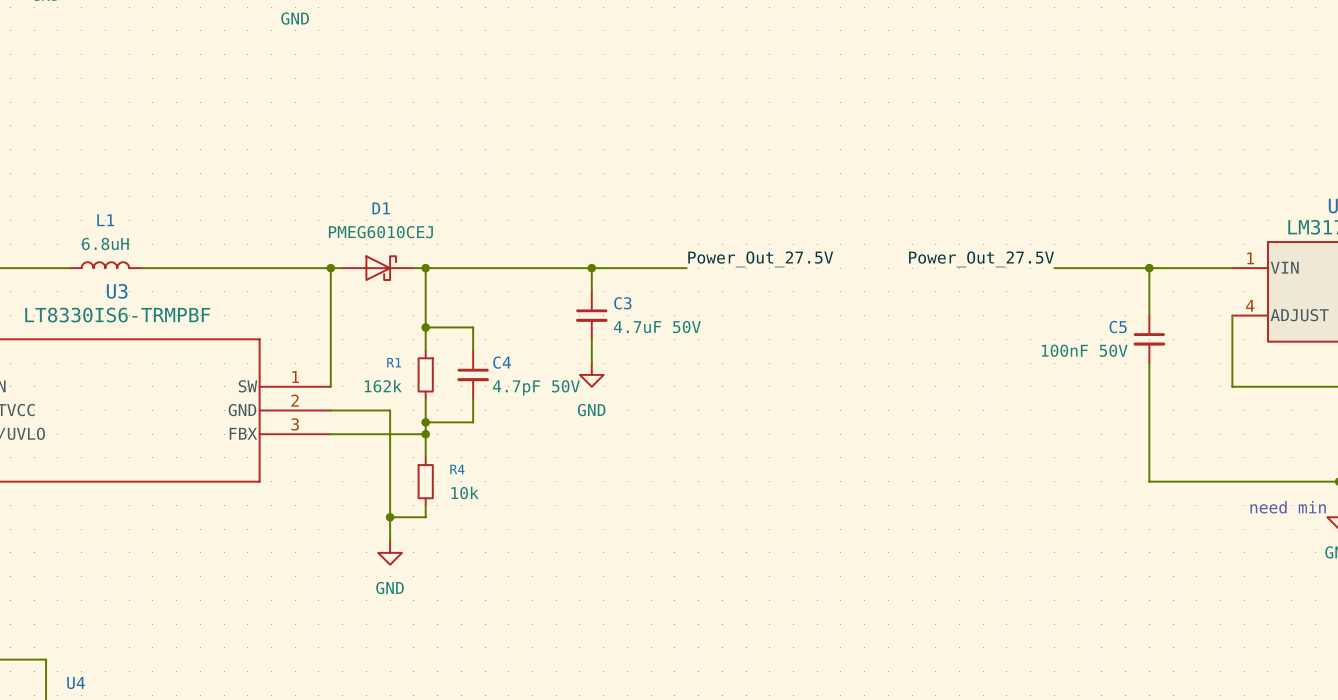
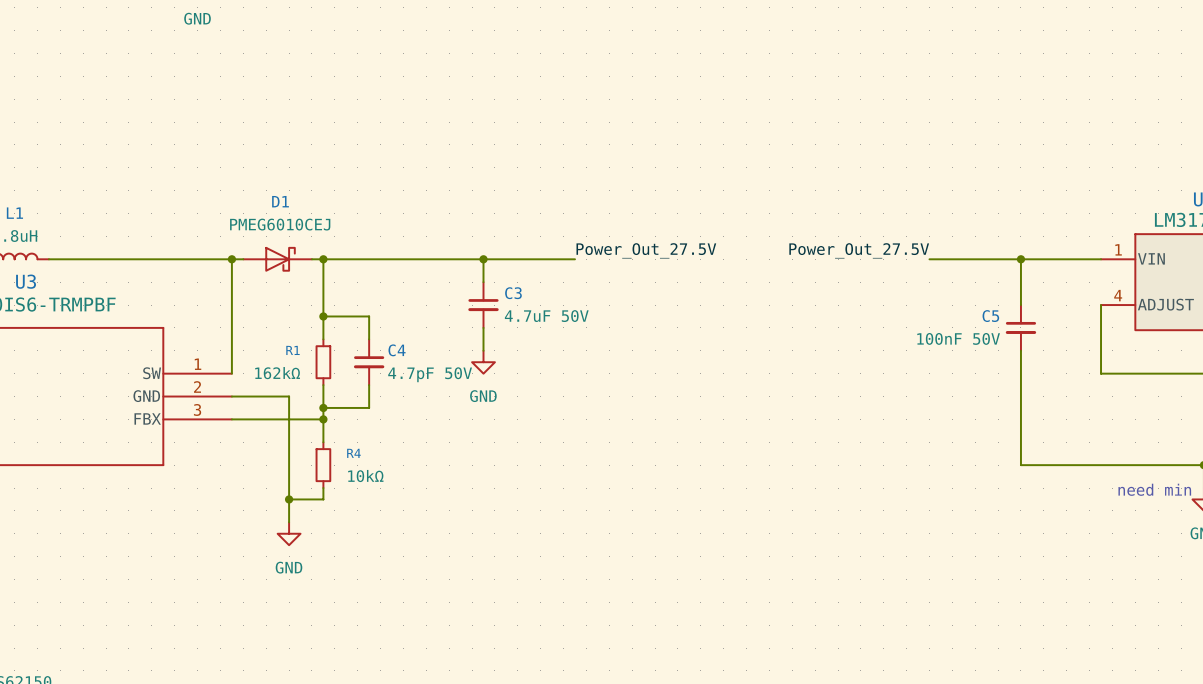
R1 value: 162k (383, 386) -> 162kΩ (277, 373)
R4 value: 10k (464, 492) -> 10kΩ (365, 476)

